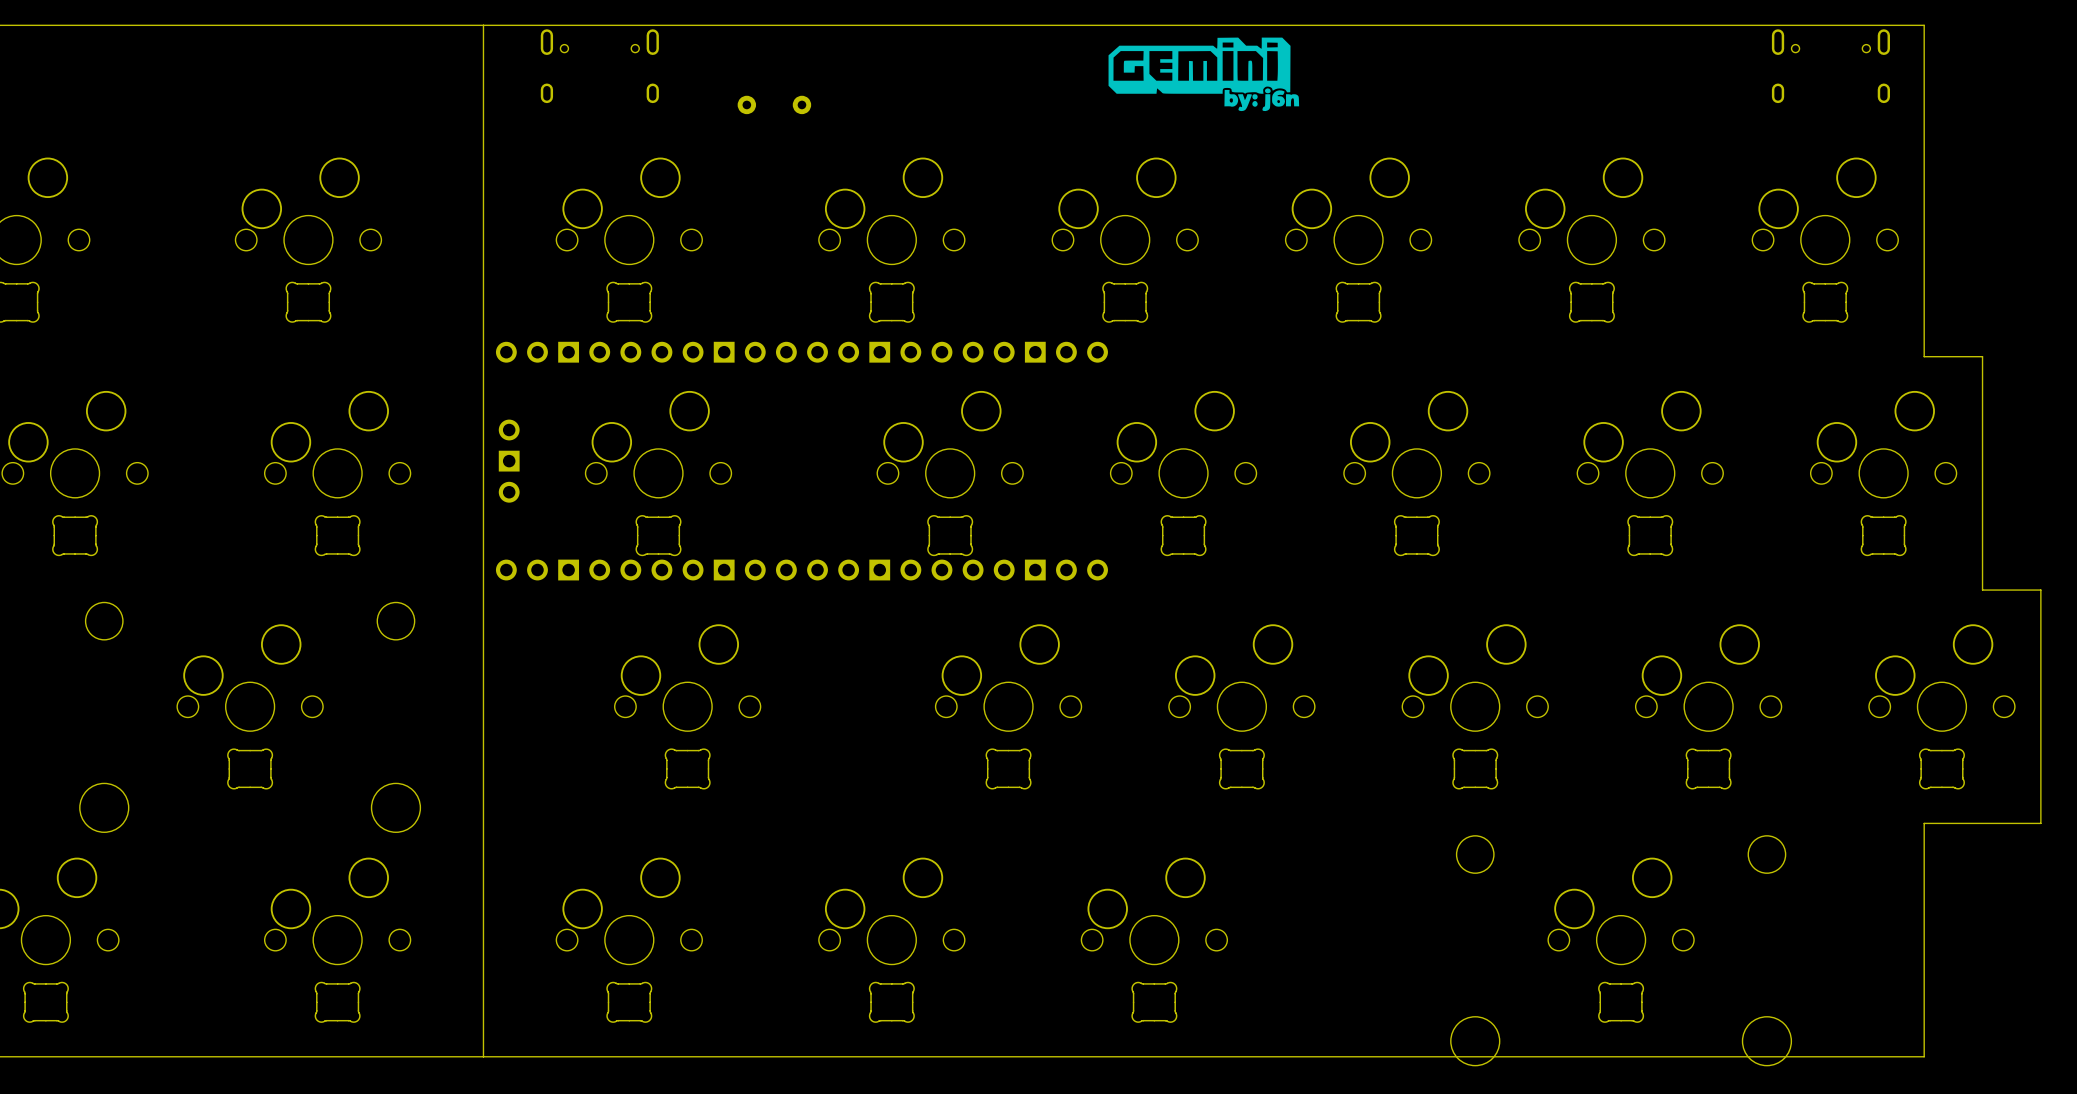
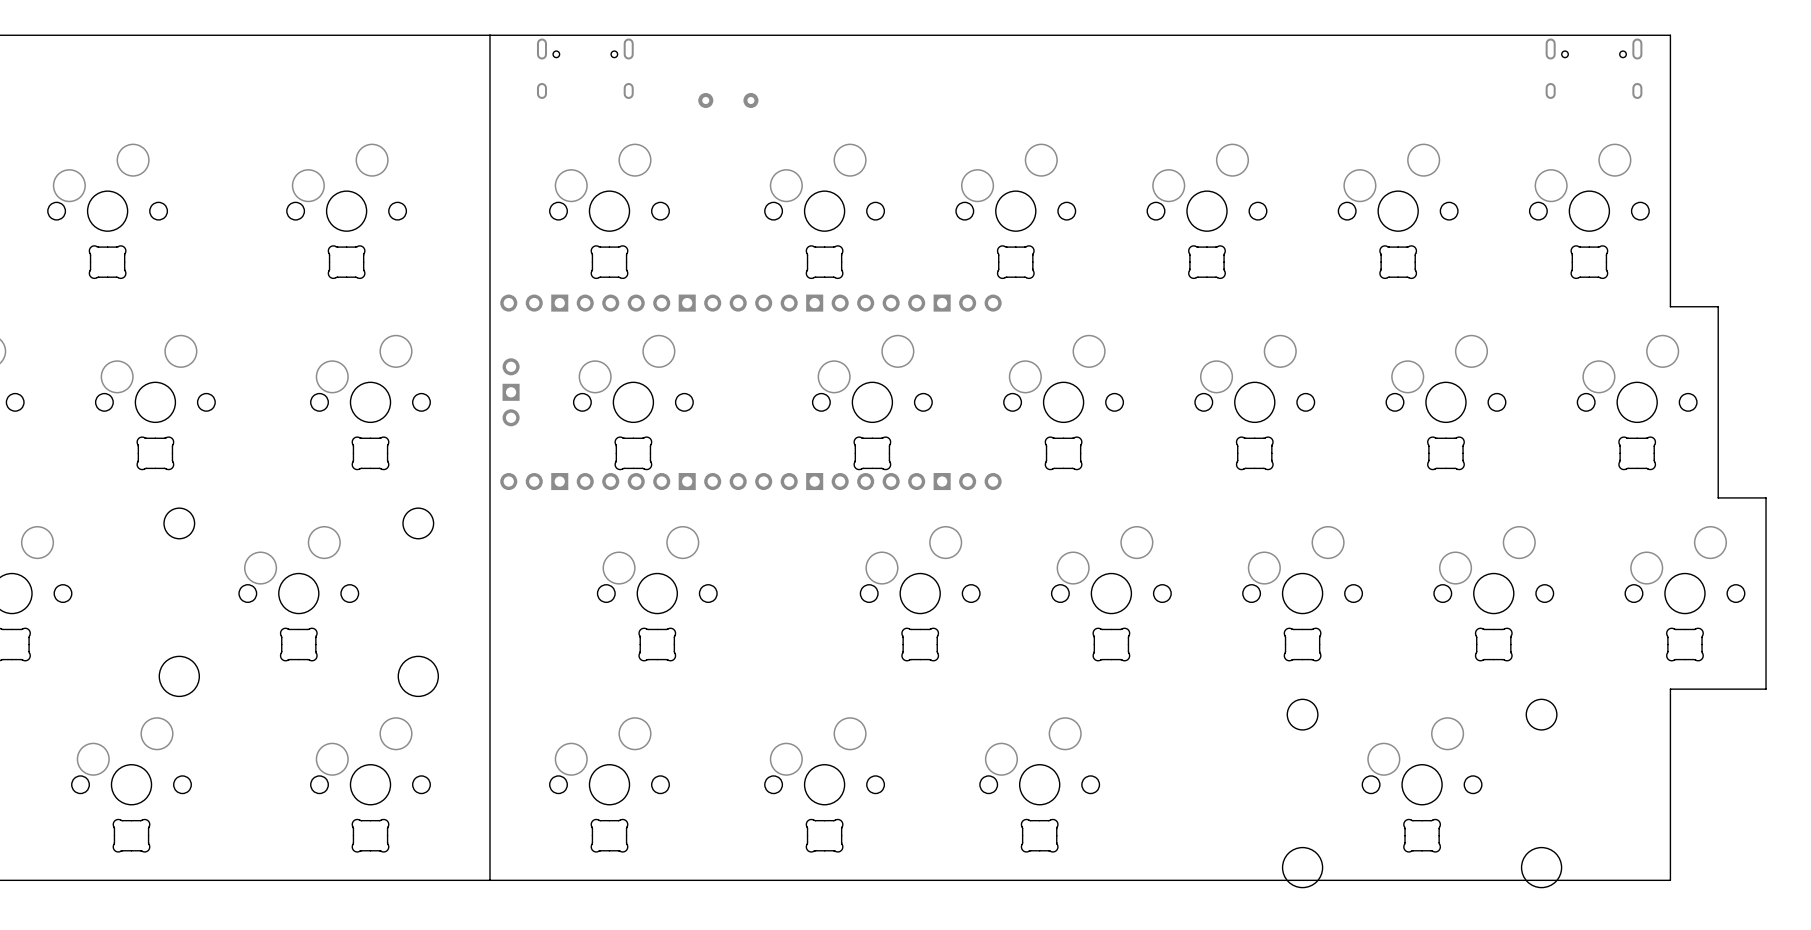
drawing: [1108, 37, 1300, 112] -> none

